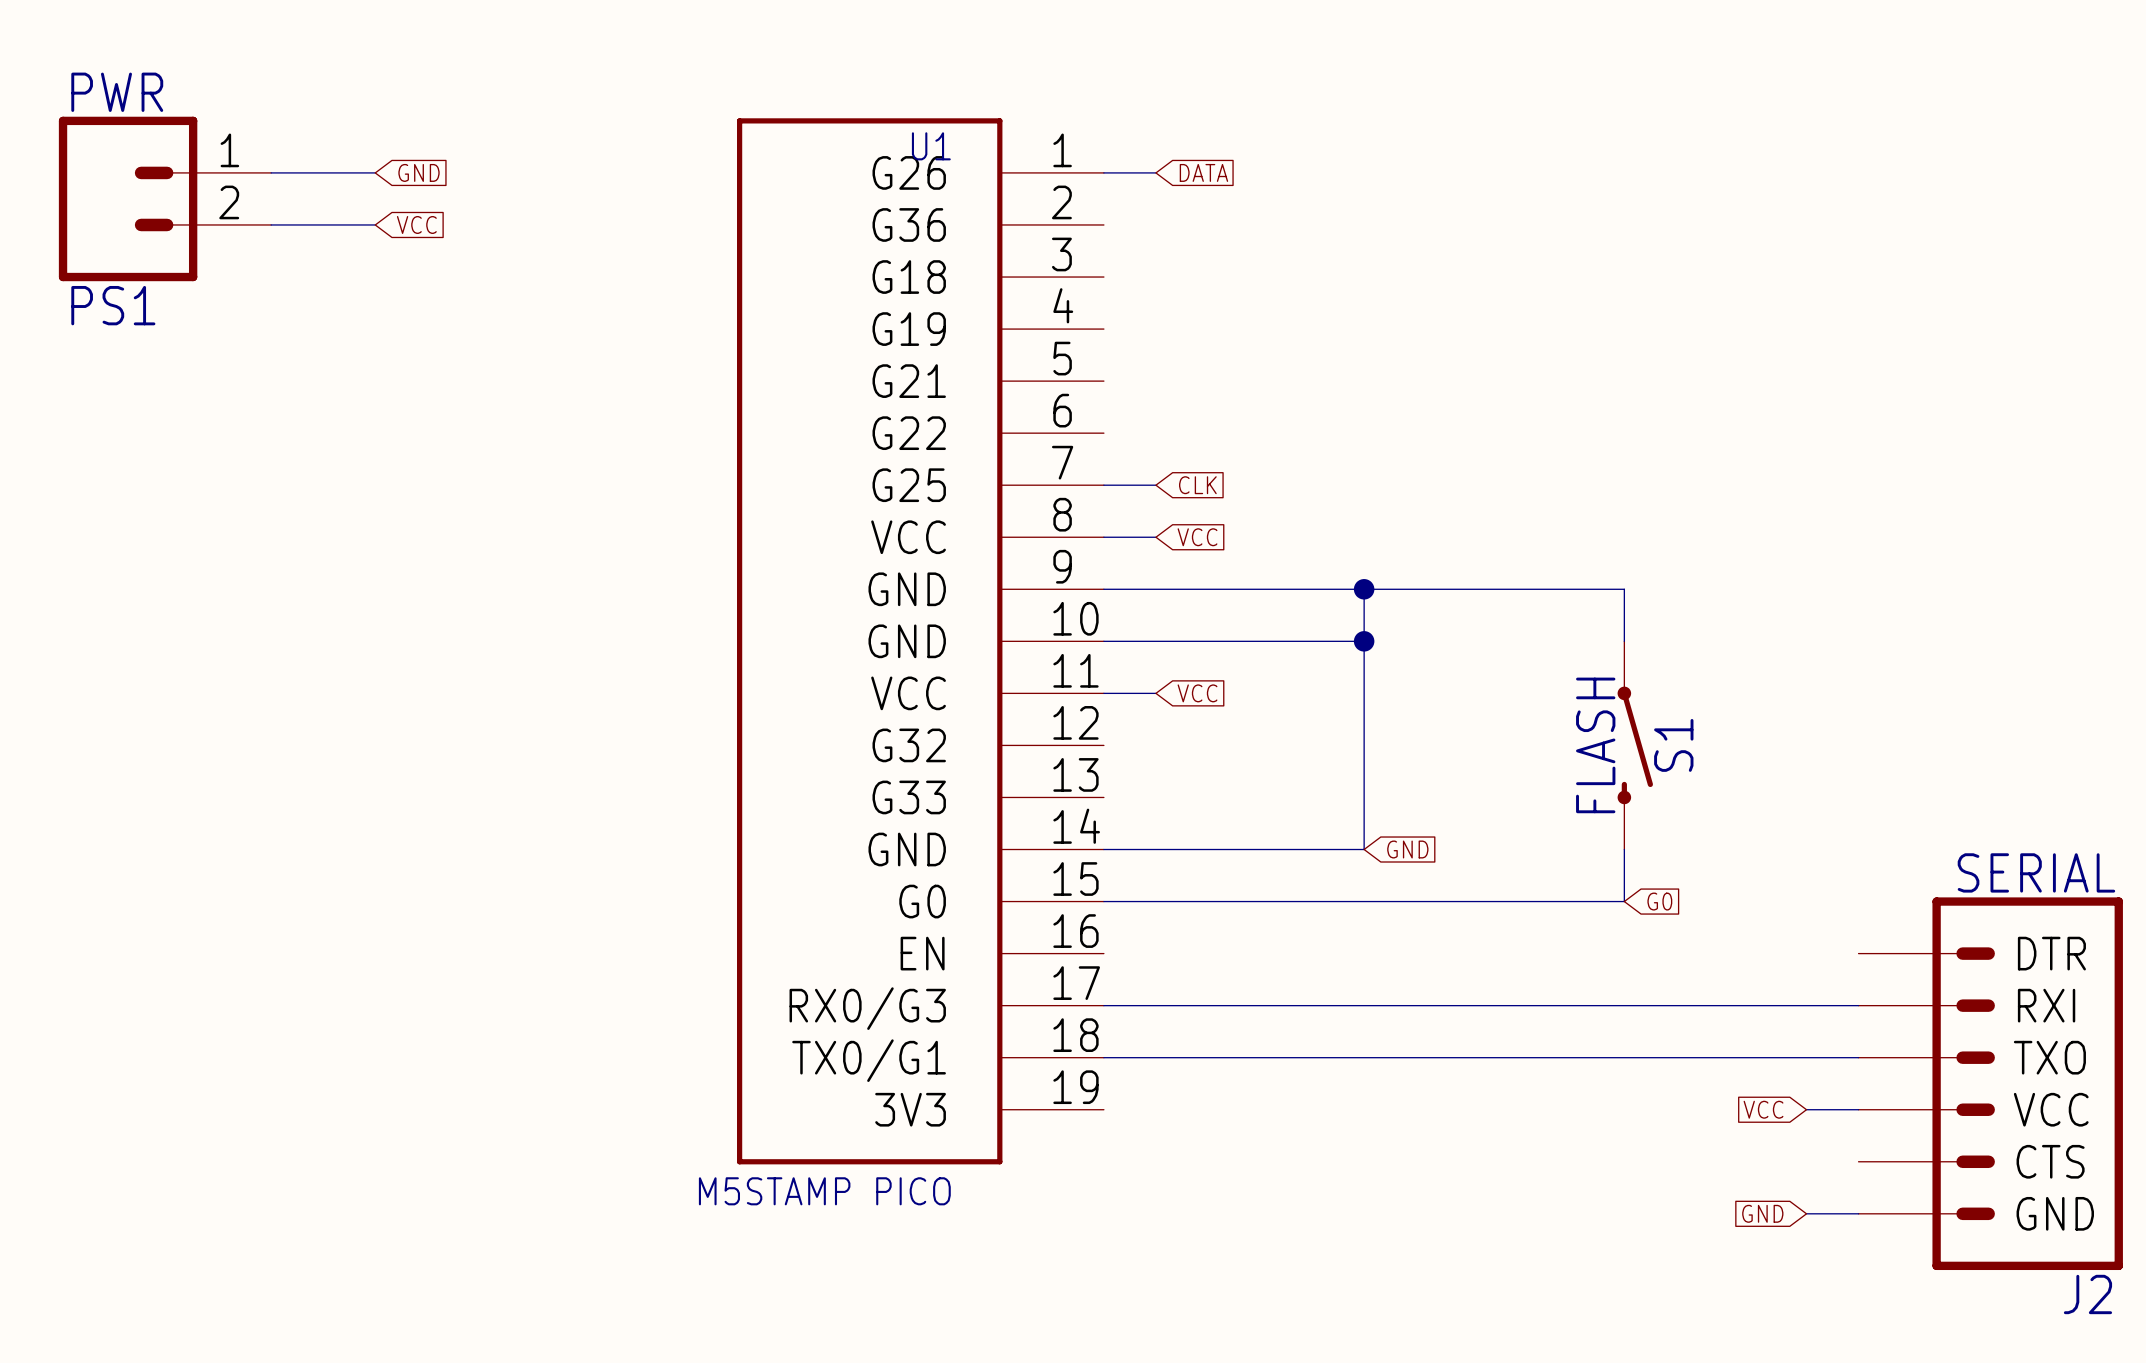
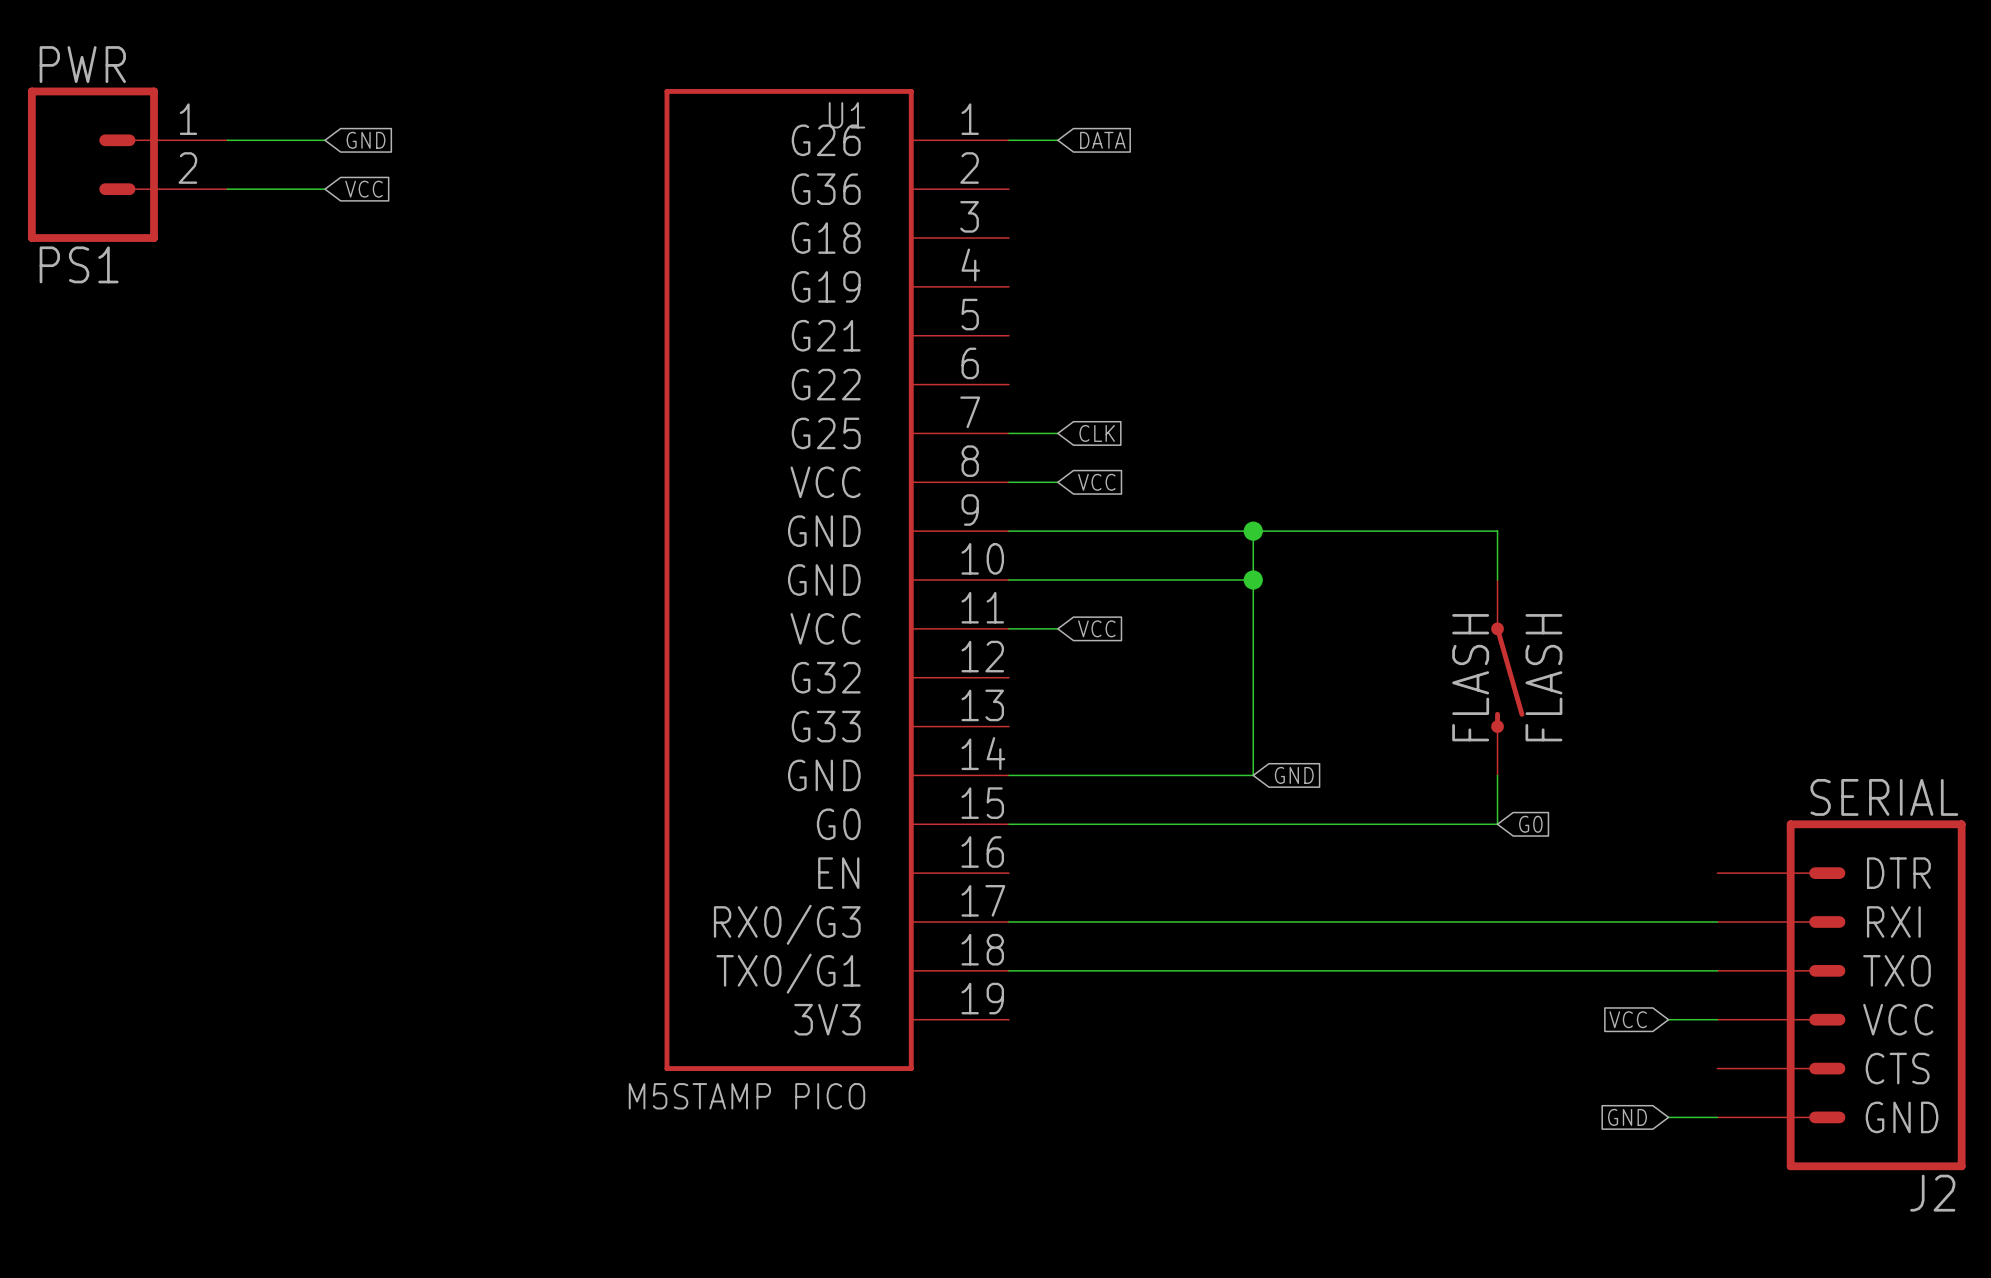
S1 name: S1 (1673, 745) -> FLASH (1543, 677)

